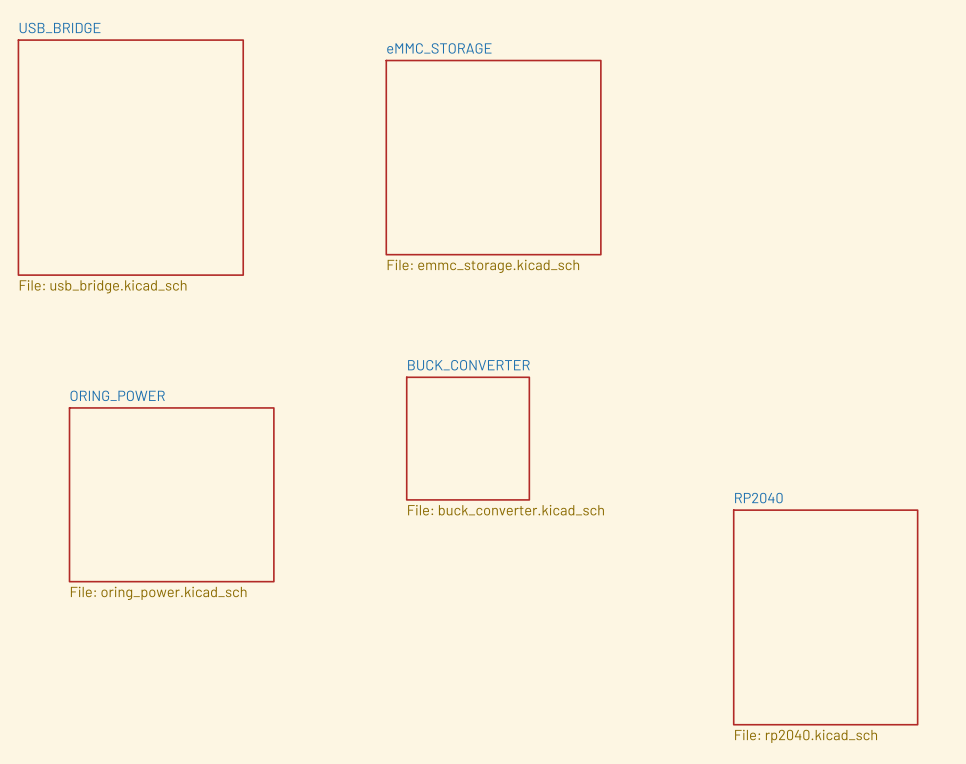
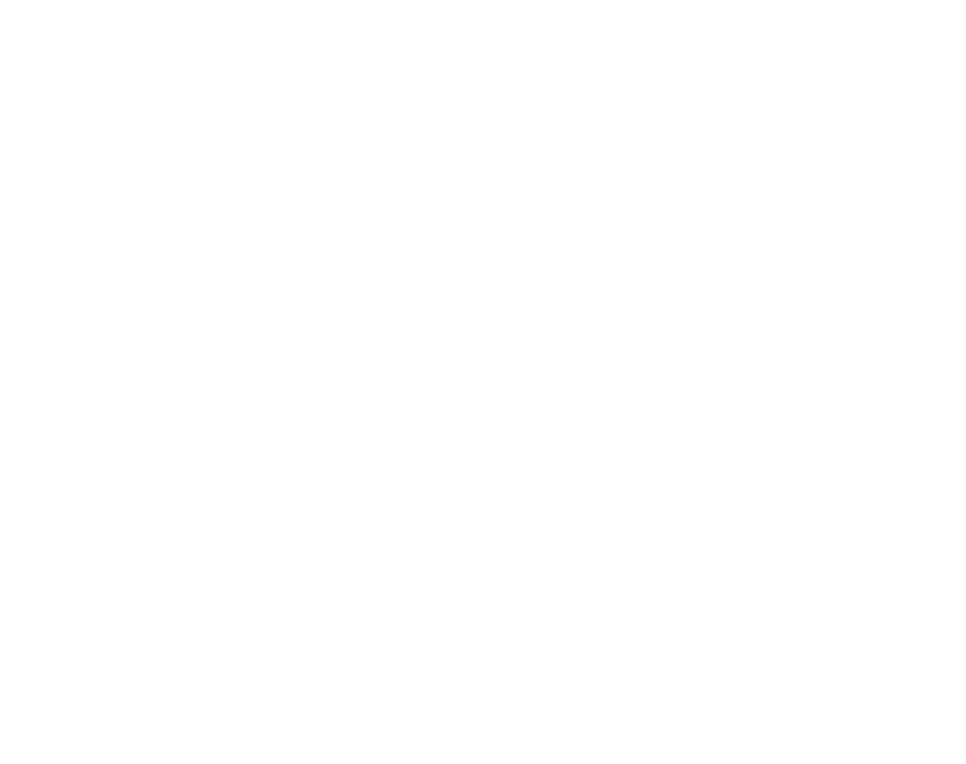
sheet USB_BRIDGE: File: usb_bridge.kicad_sch (130, 157) -> none
sheet eMMC_STORAGE: File: emmc_storage.kicad_sch (493, 157) -> none
sheet BUCK_CONVERTER: File: buck_converter.kicad_sch (468, 438) -> none
sheet ORING_POWER: File: oring_power.kicad_sch (171, 494) -> none
sheet RP2040: File: rp2040.kicad_sch (825, 617) -> none

